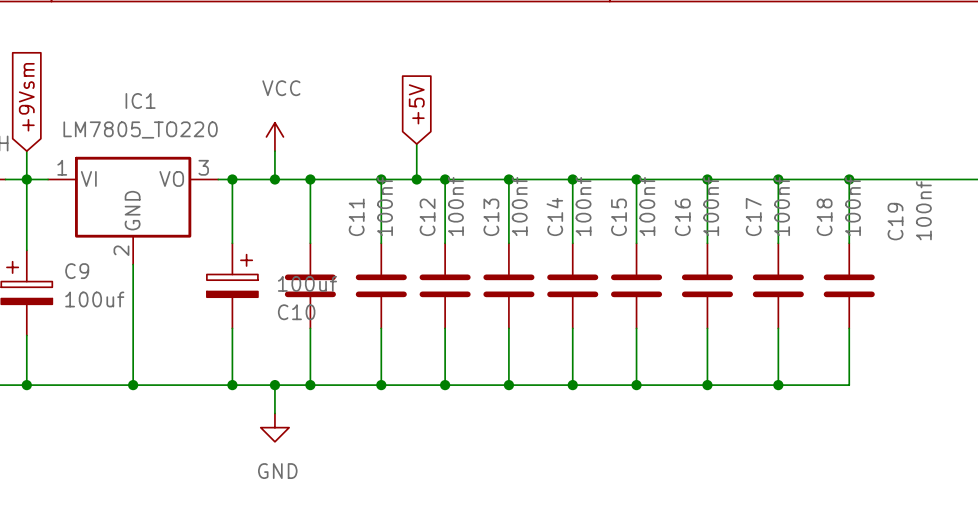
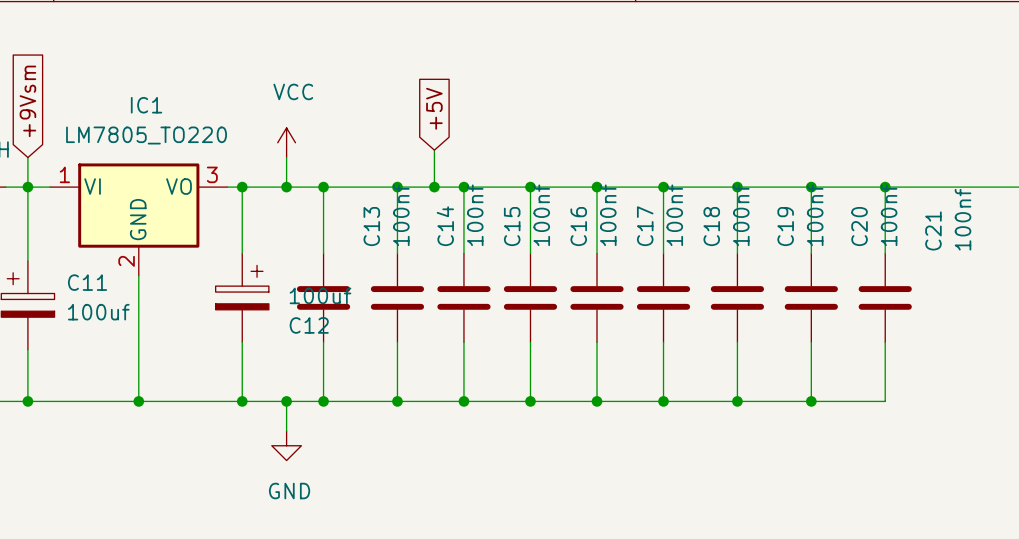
C14 name: C14 (554, 216) -> C16 (578, 226)
C17 name: C17 (753, 216) -> C19 (785, 226)
C11 name: C11 (356, 217) -> C13 (371, 226)
C12 name: C12 (427, 217) -> C14 (445, 226)
C13 name: C13 (491, 217) -> C15 (512, 226)
C15 name: C15 (619, 217) -> C17 (645, 226)
C16 name: C16 (682, 217) -> C18 (711, 226)
C18 name: C18 (824, 217) -> C20 (859, 226)
C19 name: C19 (895, 221) -> C21 (933, 230)
C9 name: C9 (77, 271) -> C11 (87, 282)
C10 name: C10 (296, 312) -> C12 (309, 325)

